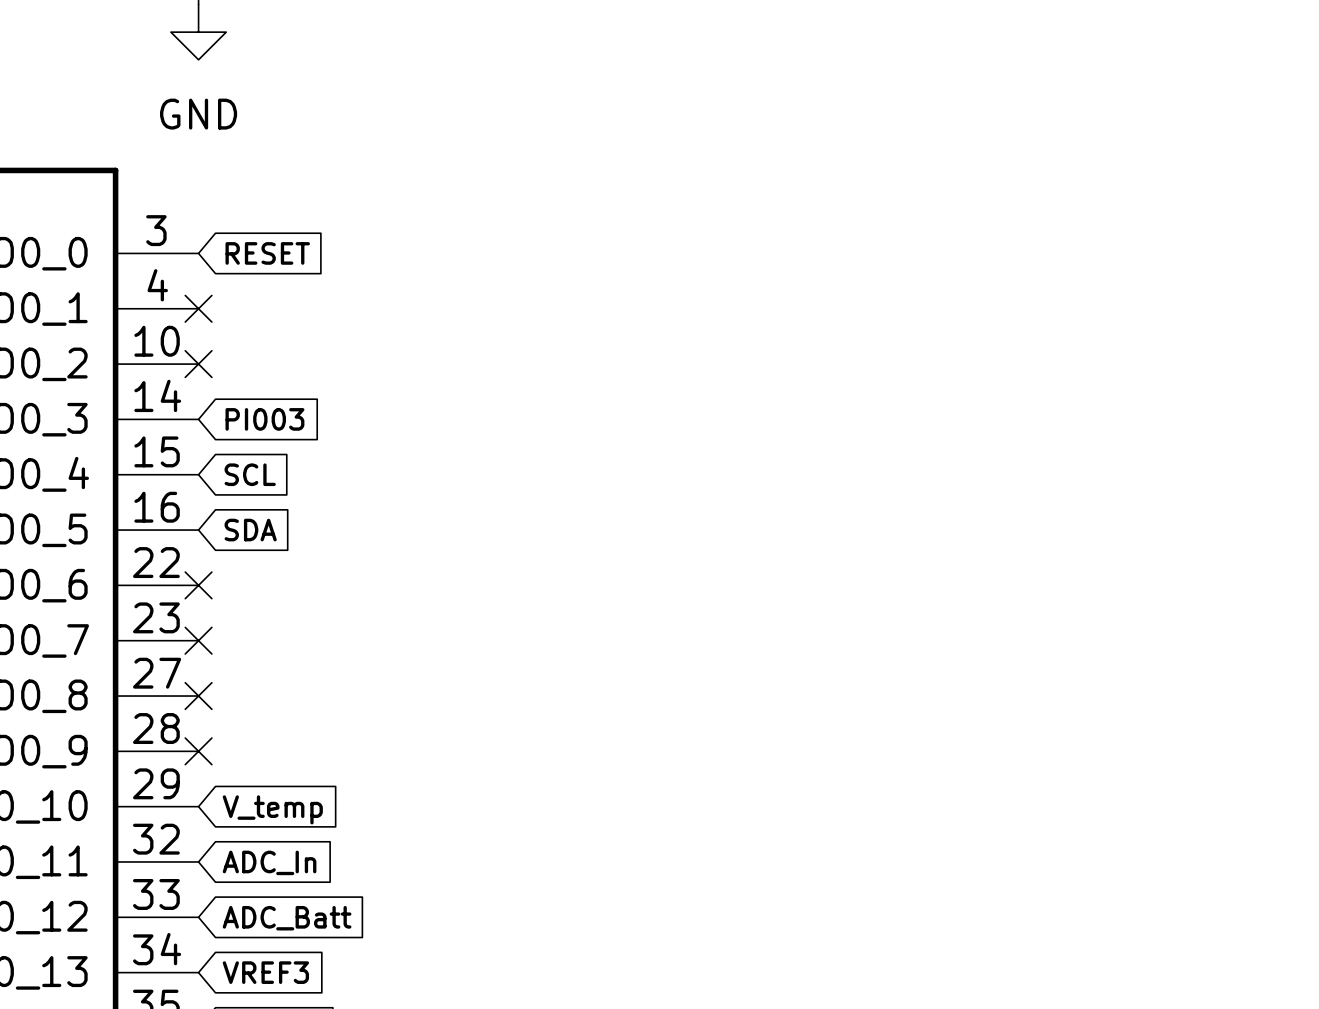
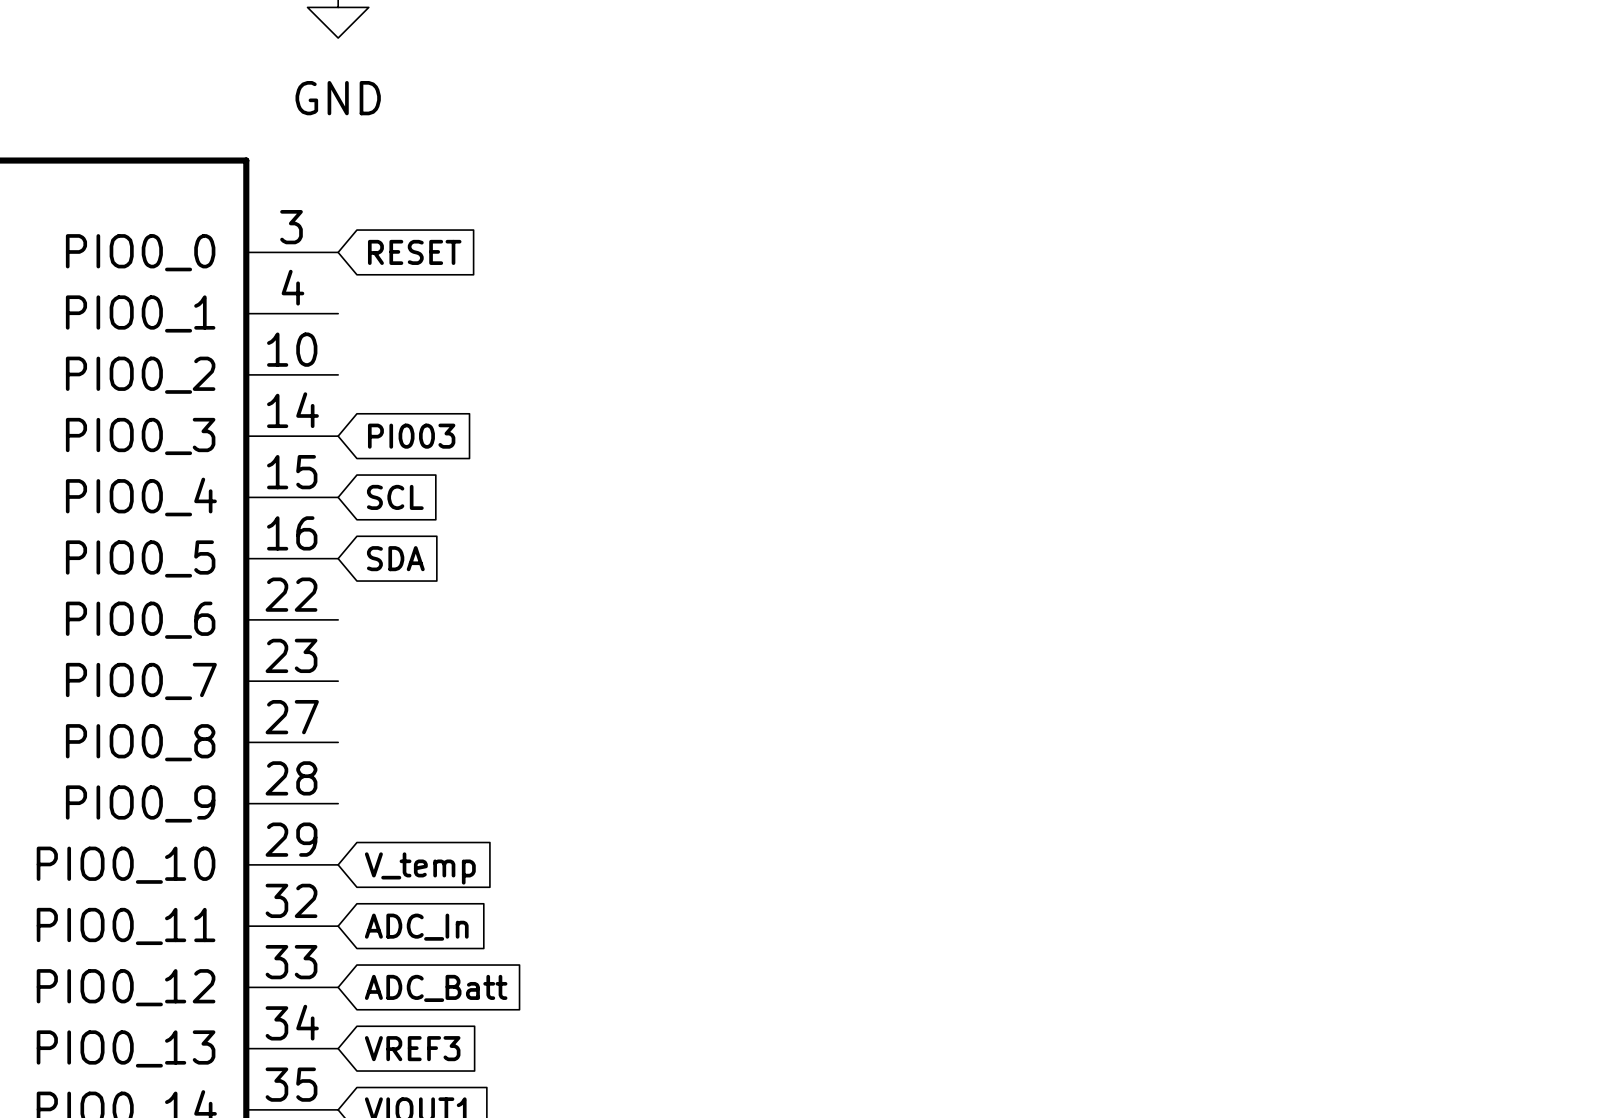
no-connect mark: (198, 308) -> none
no-connect mark: (198, 364) -> none
no-connect mark: (198, 585) -> none
no-connect mark: (198, 640) -> none
no-connect mark: (198, 696) -> none
no-connect mark: (198, 751) -> none

